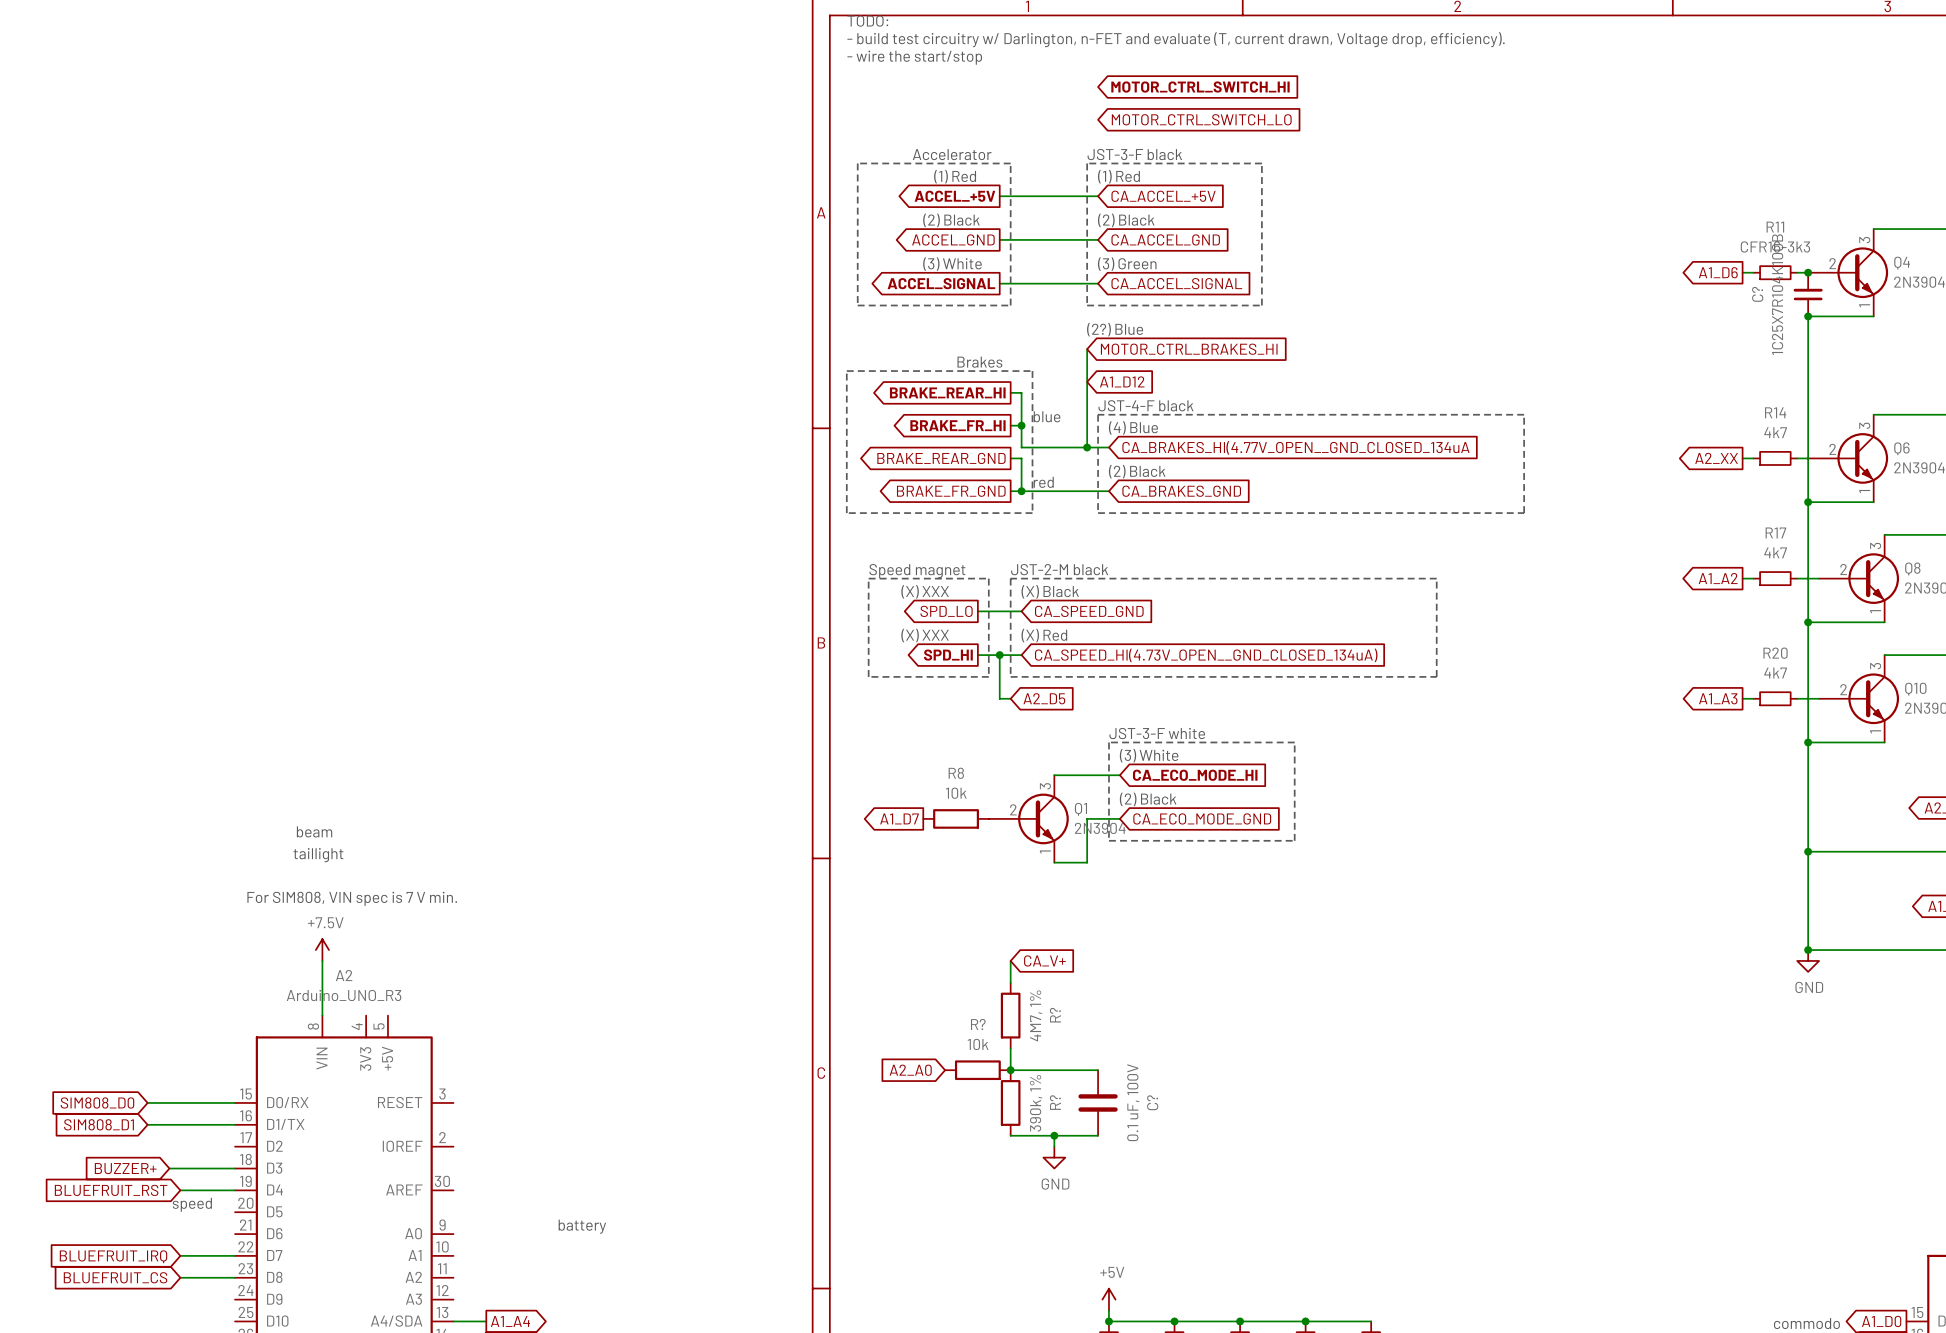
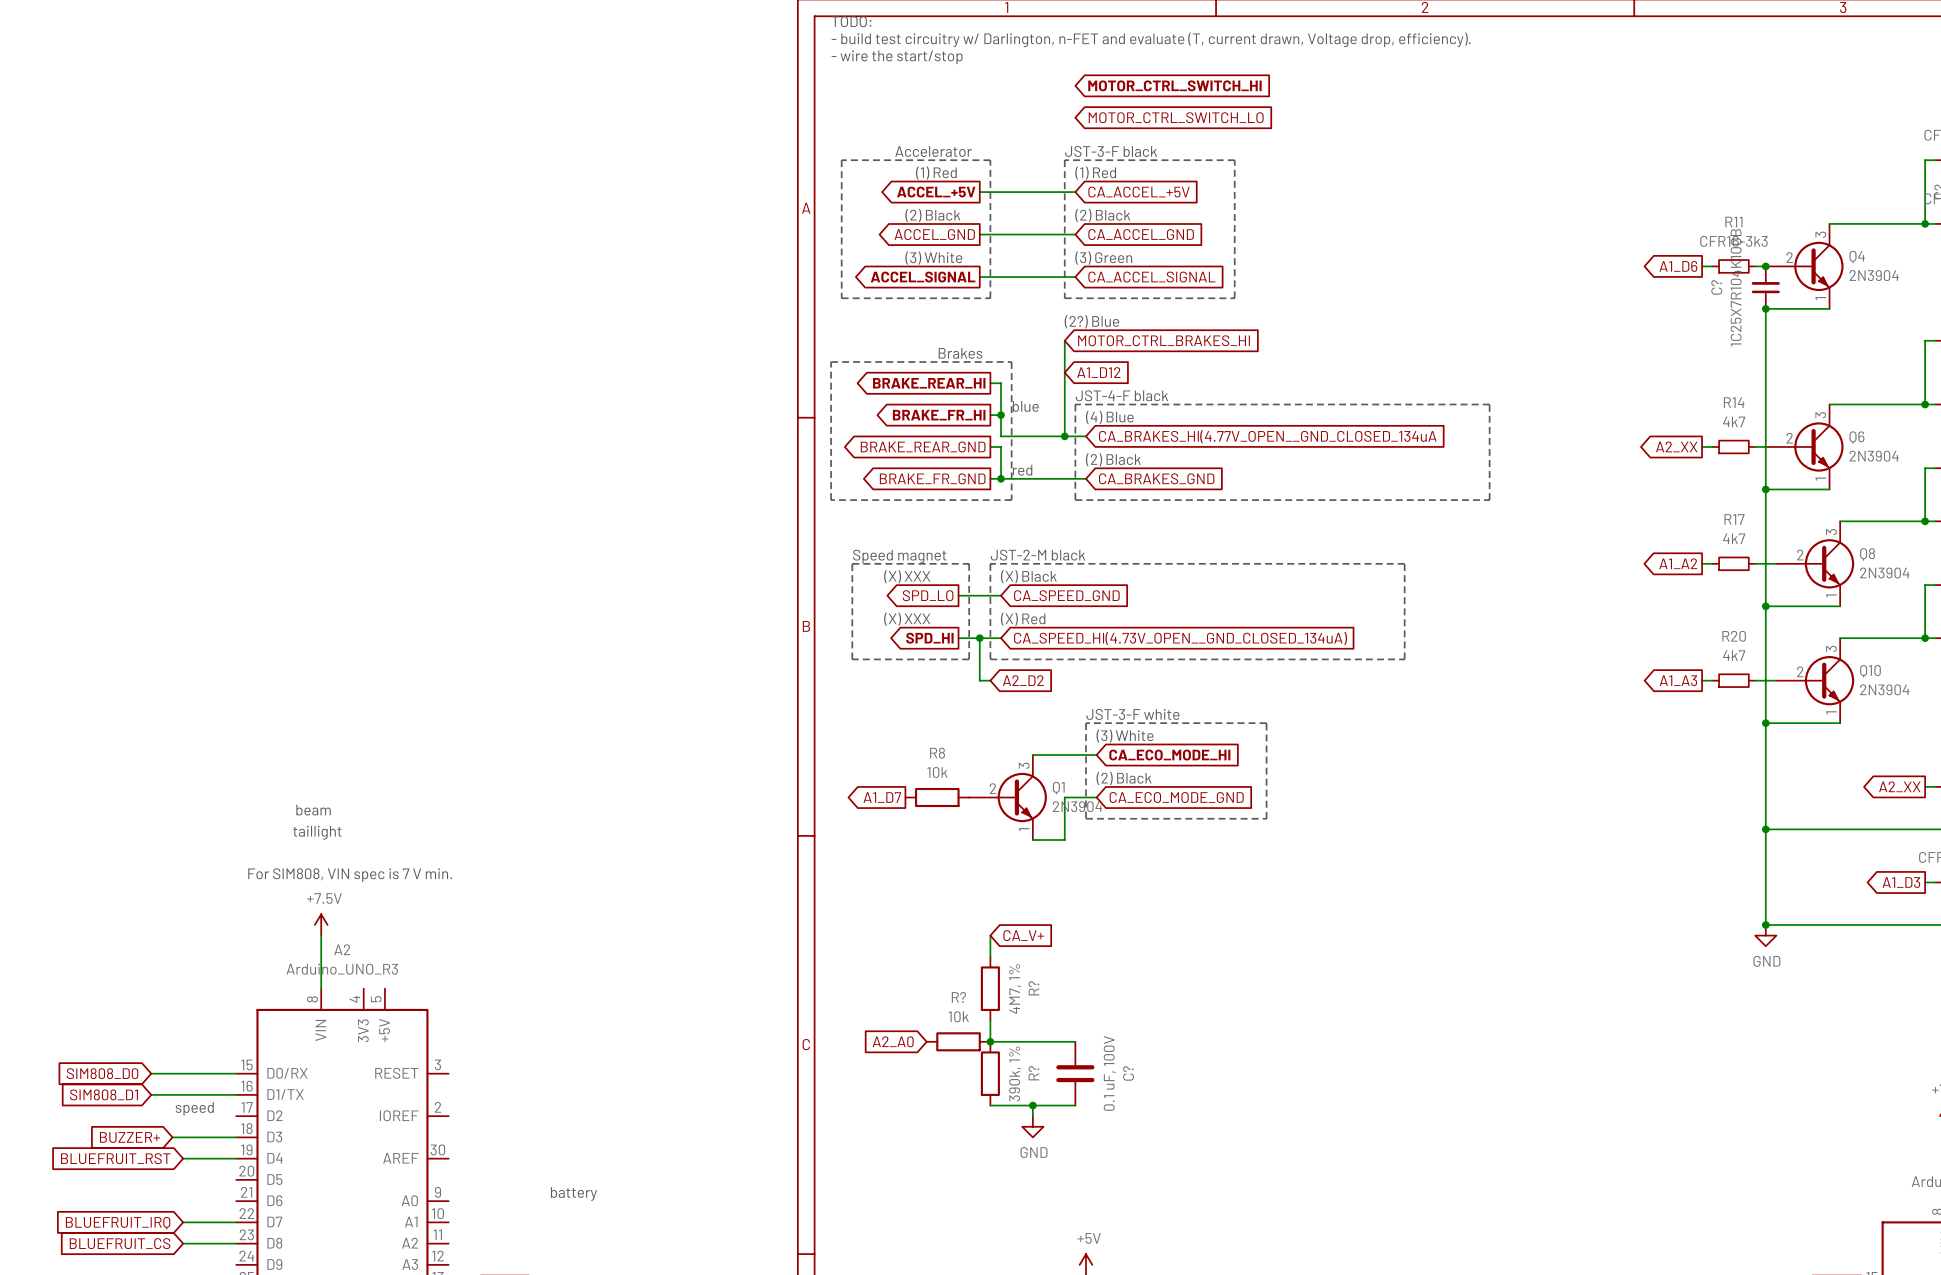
global label: A2_D5 (1044, 698) -> A2_D2 (1023, 680)
text position: speed (192, 1204) -> speed (194, 1108)

